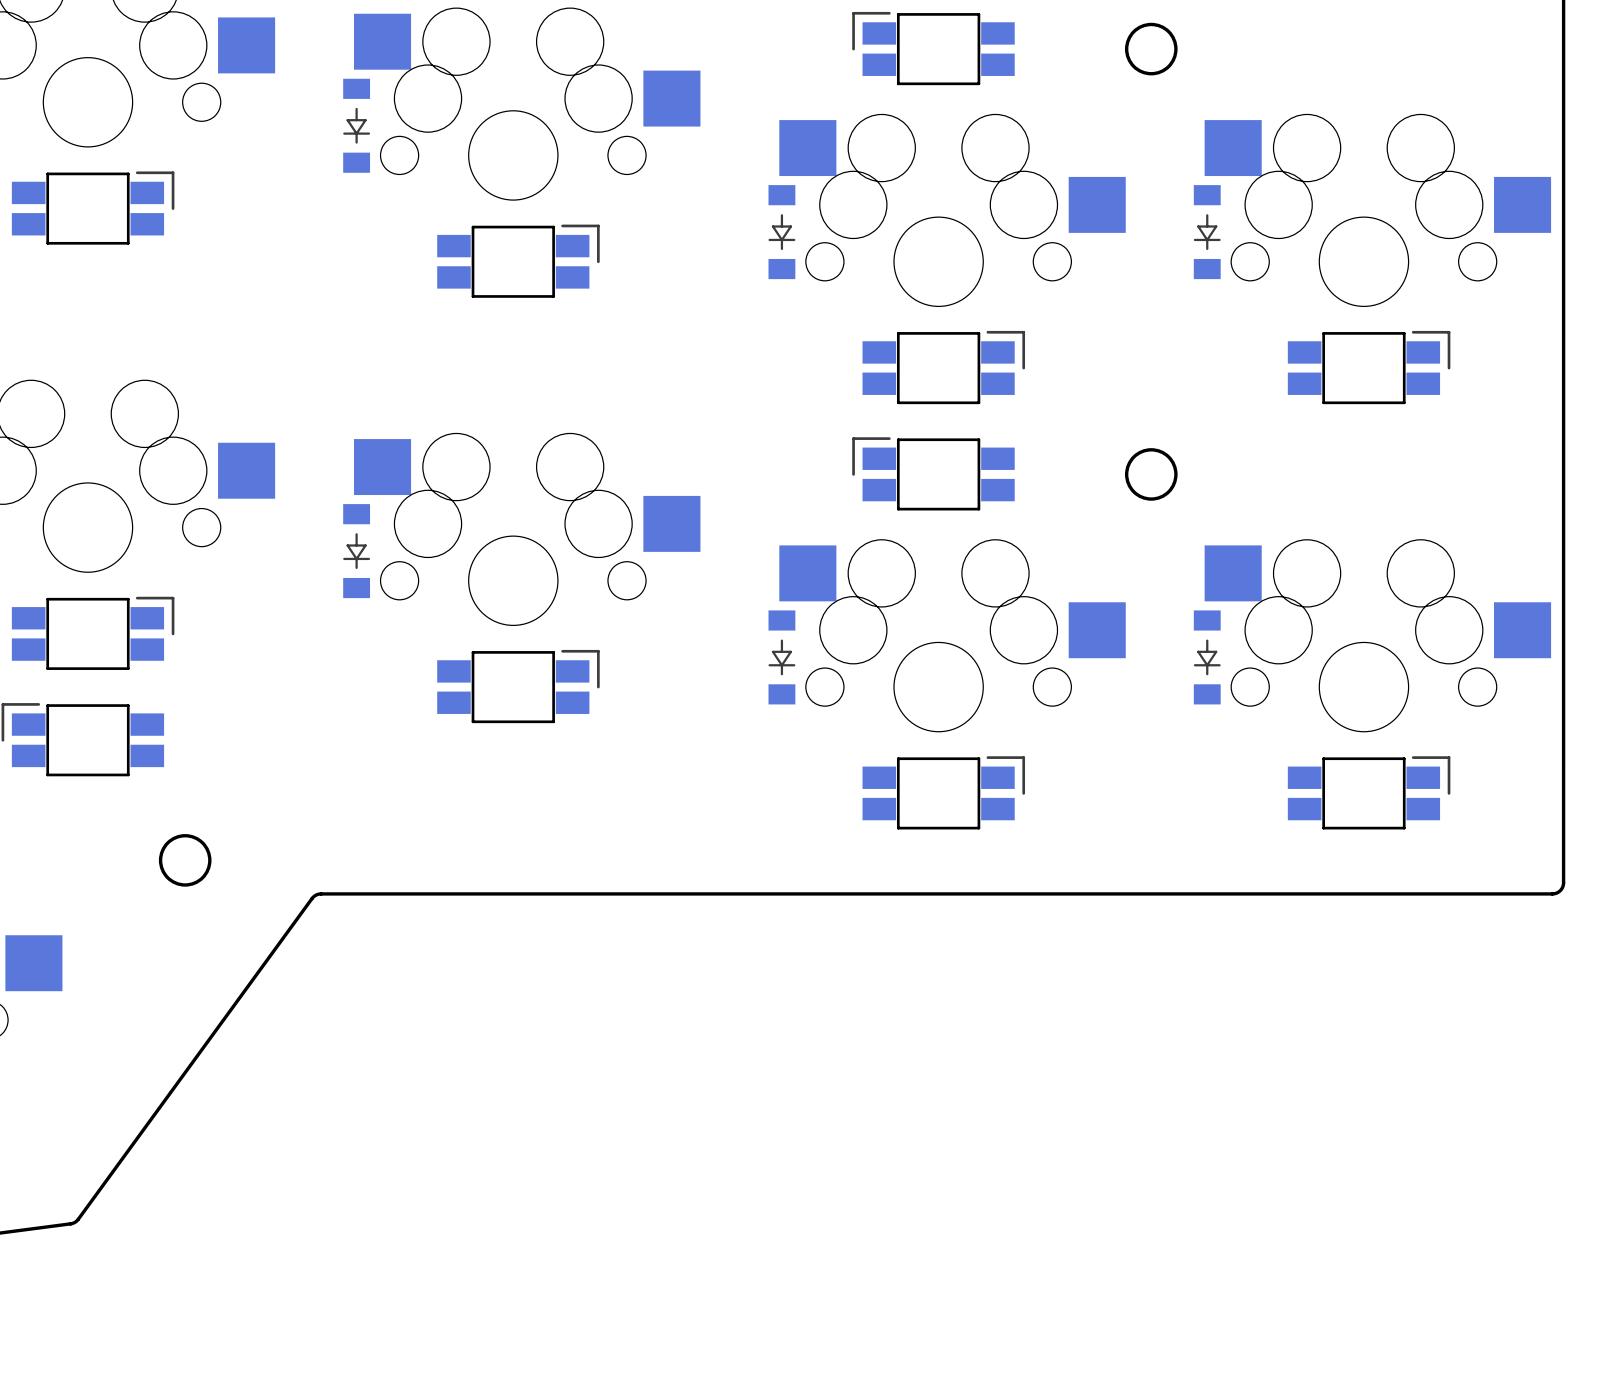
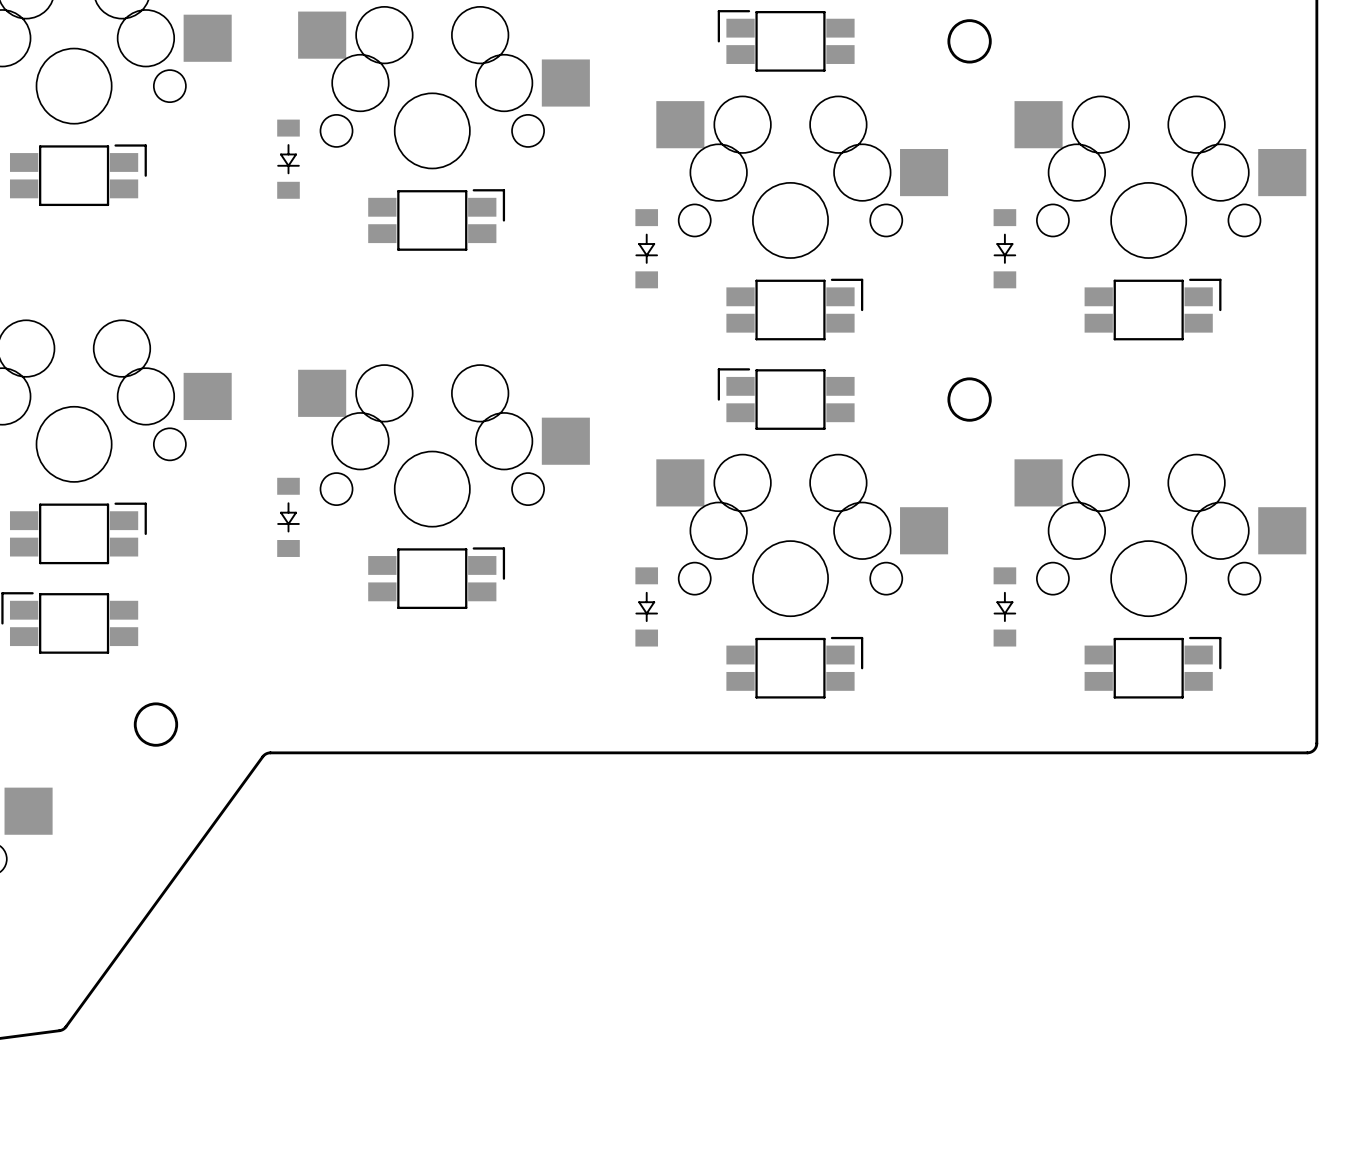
part position: (356, 125) -> (288, 159)
part position: (781, 232) -> (646, 248)
part position: (1207, 232) -> (1004, 248)
part position: (356, 551) -> (288, 517)
part position: (781, 657) -> (646, 606)
part position: (1207, 657) -> (1004, 606)

